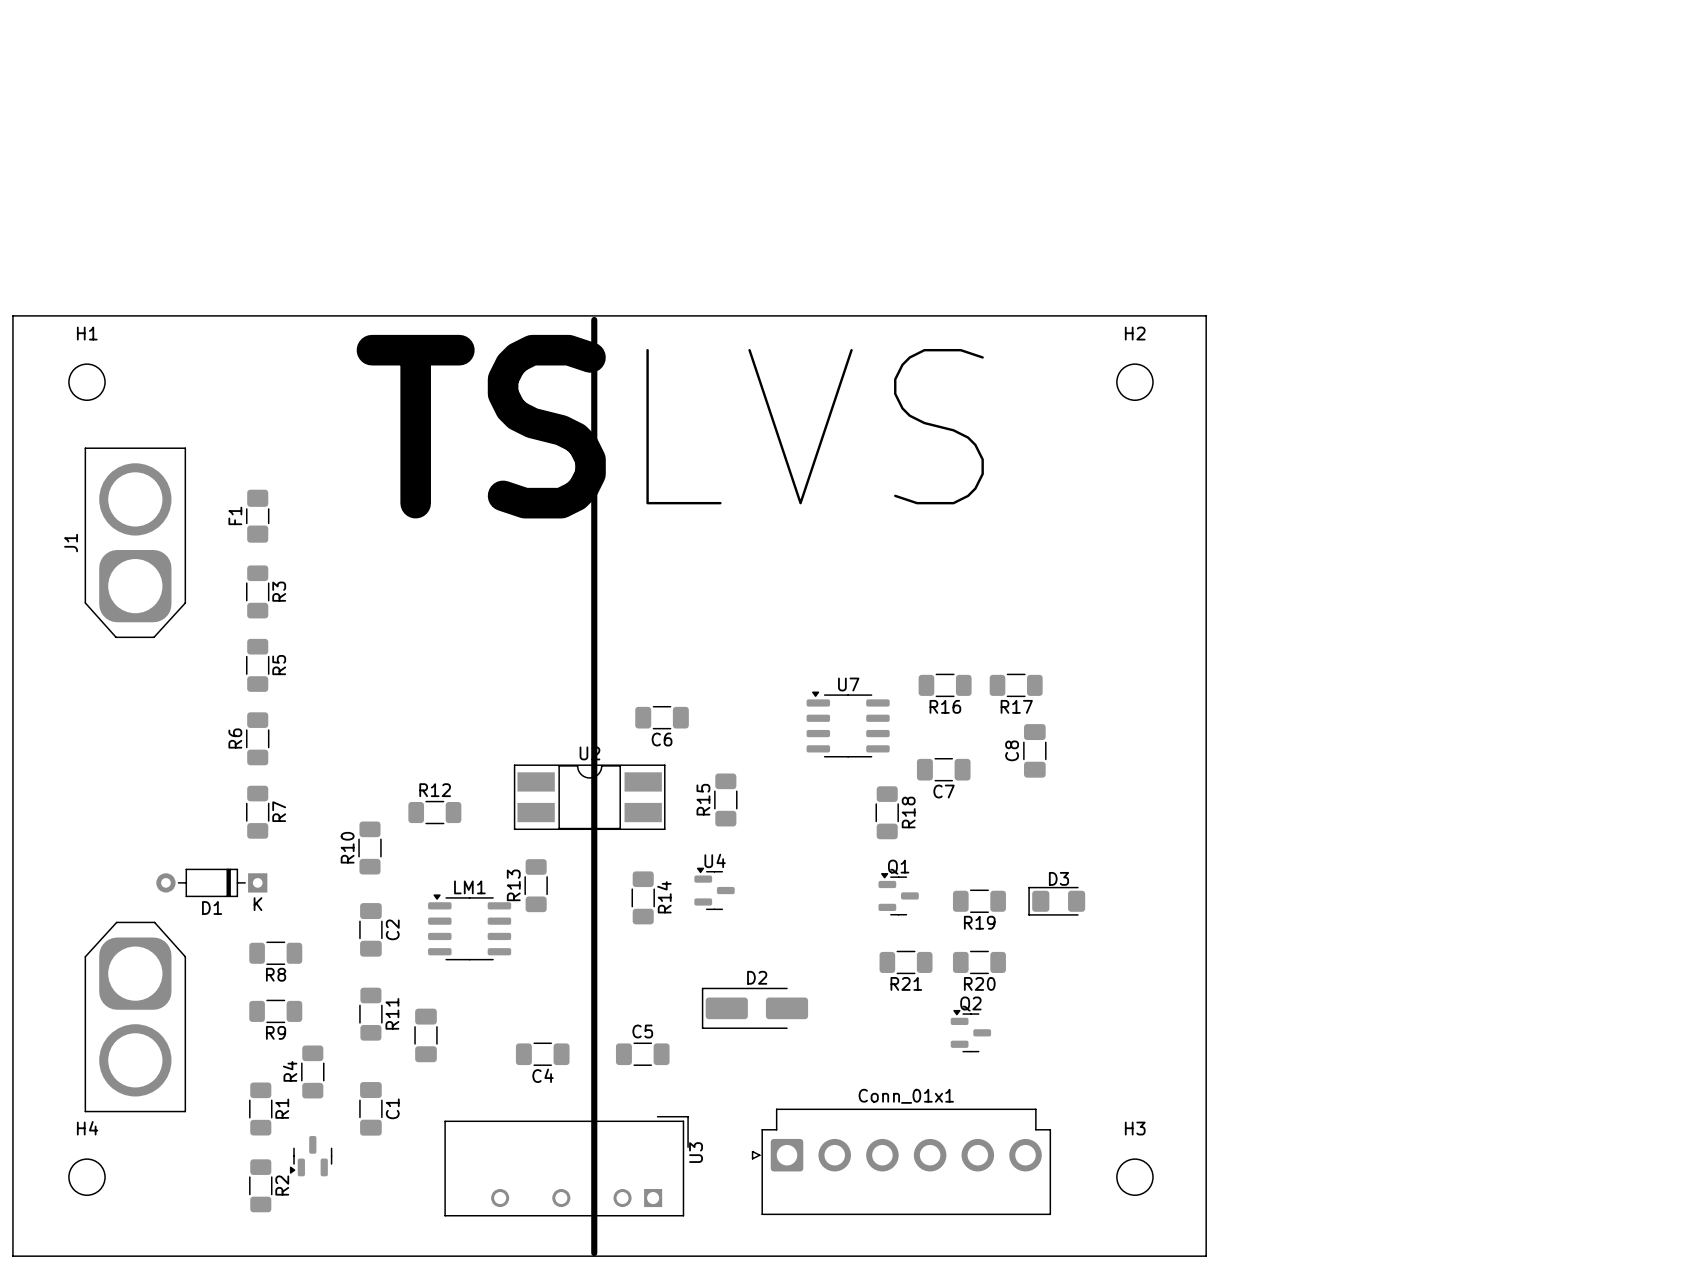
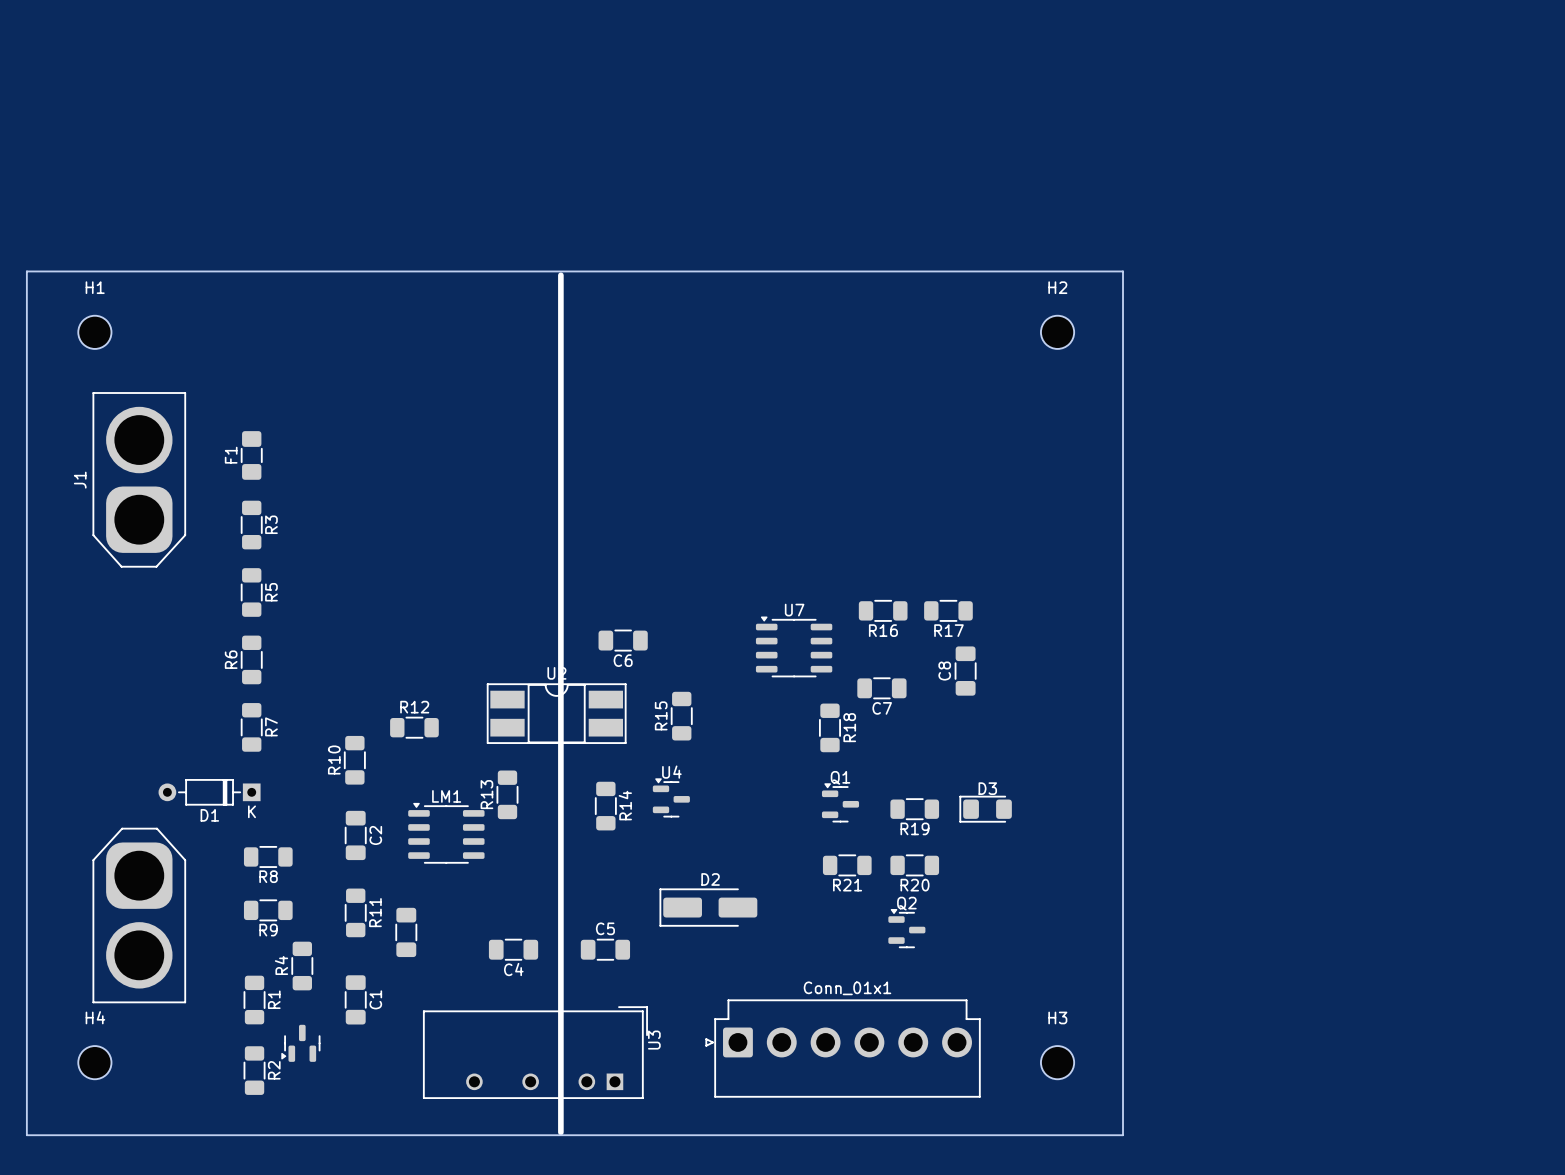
text: TS (481, 426) -> none
text: LVS (815, 426) -> none

